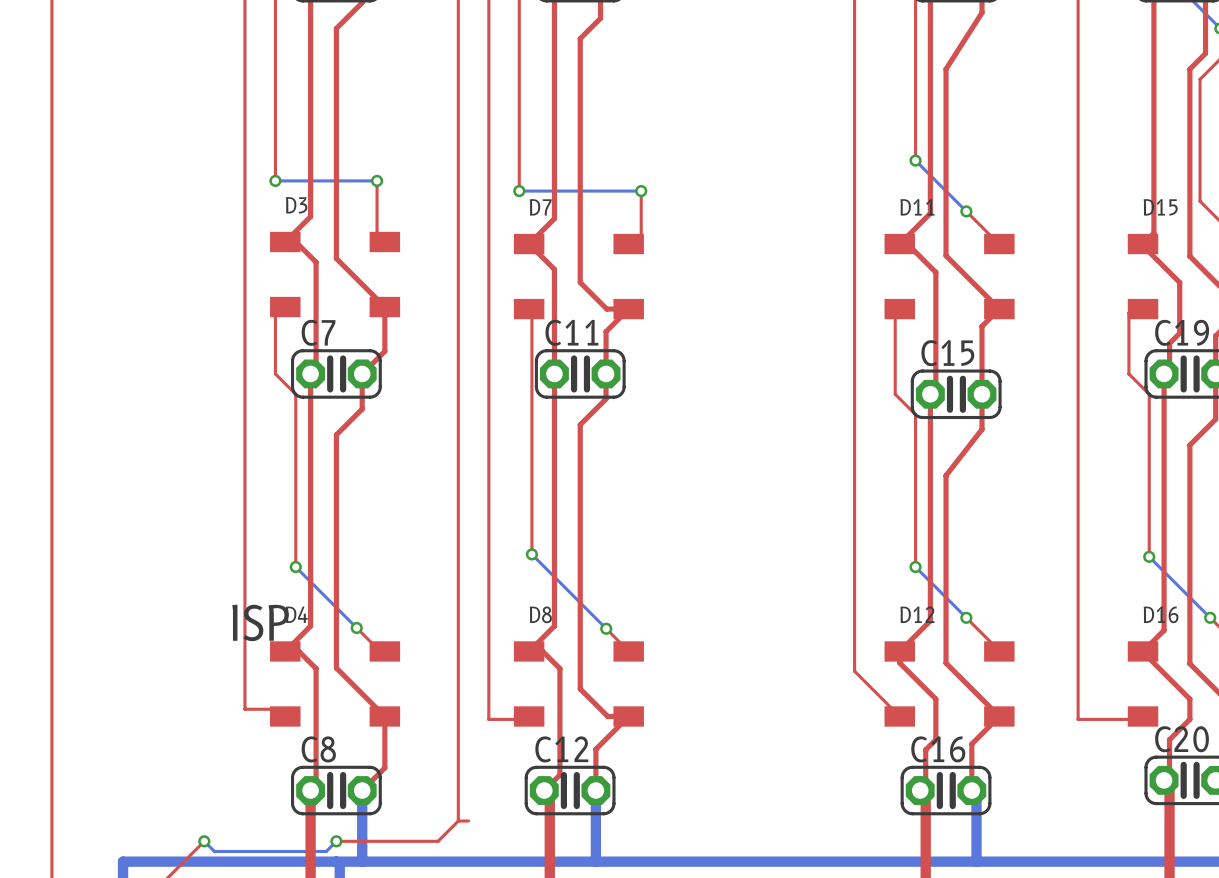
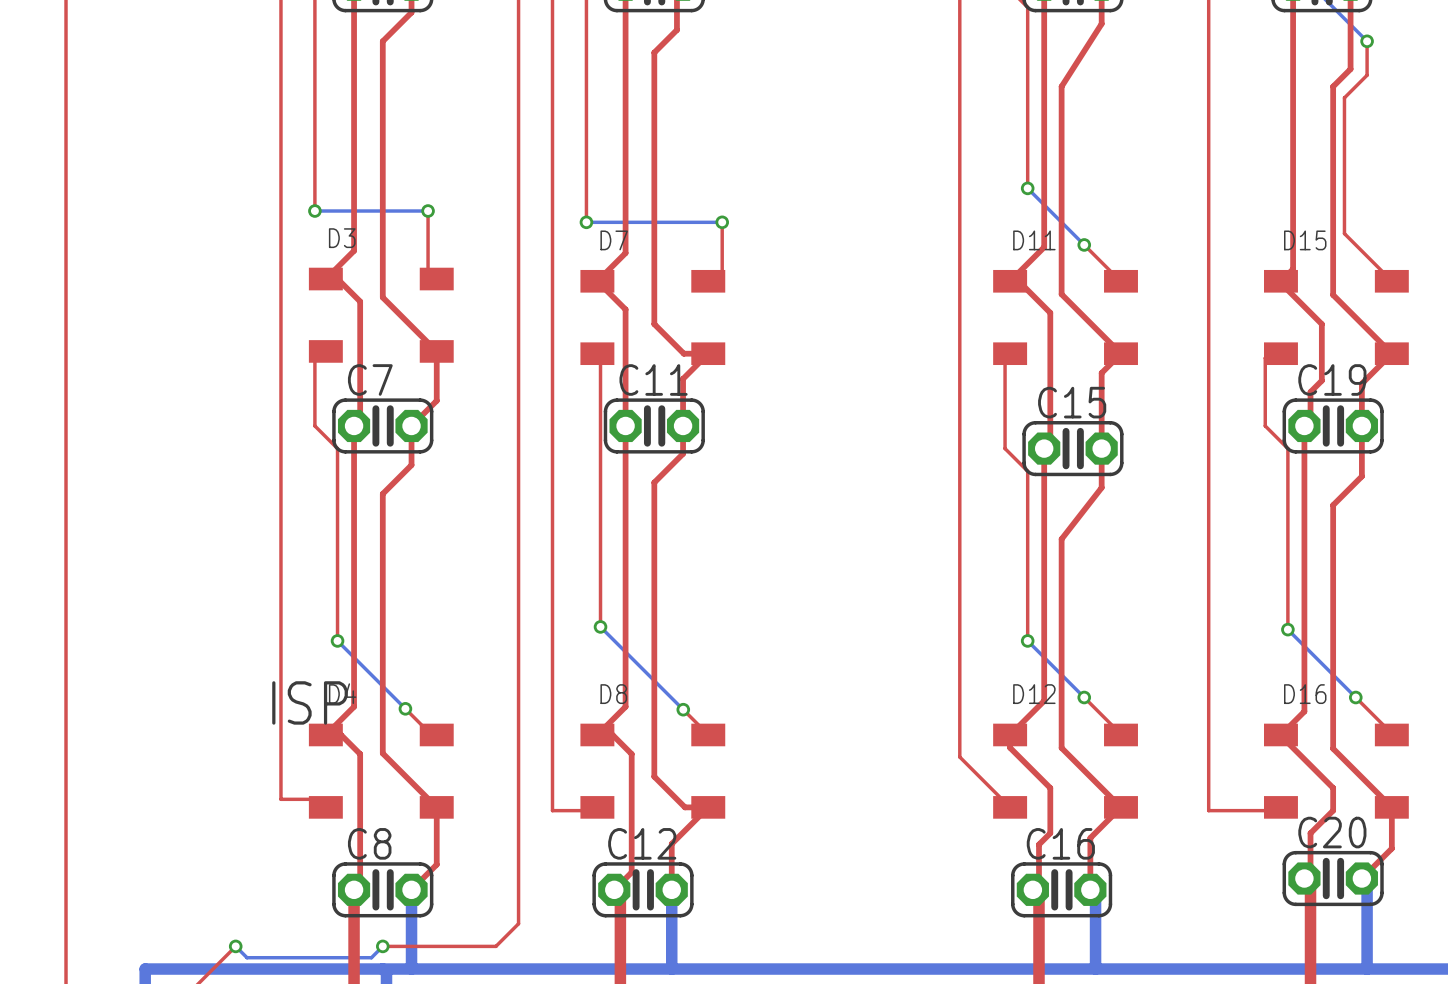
top track: (458, 821) (468, 821) -> none

